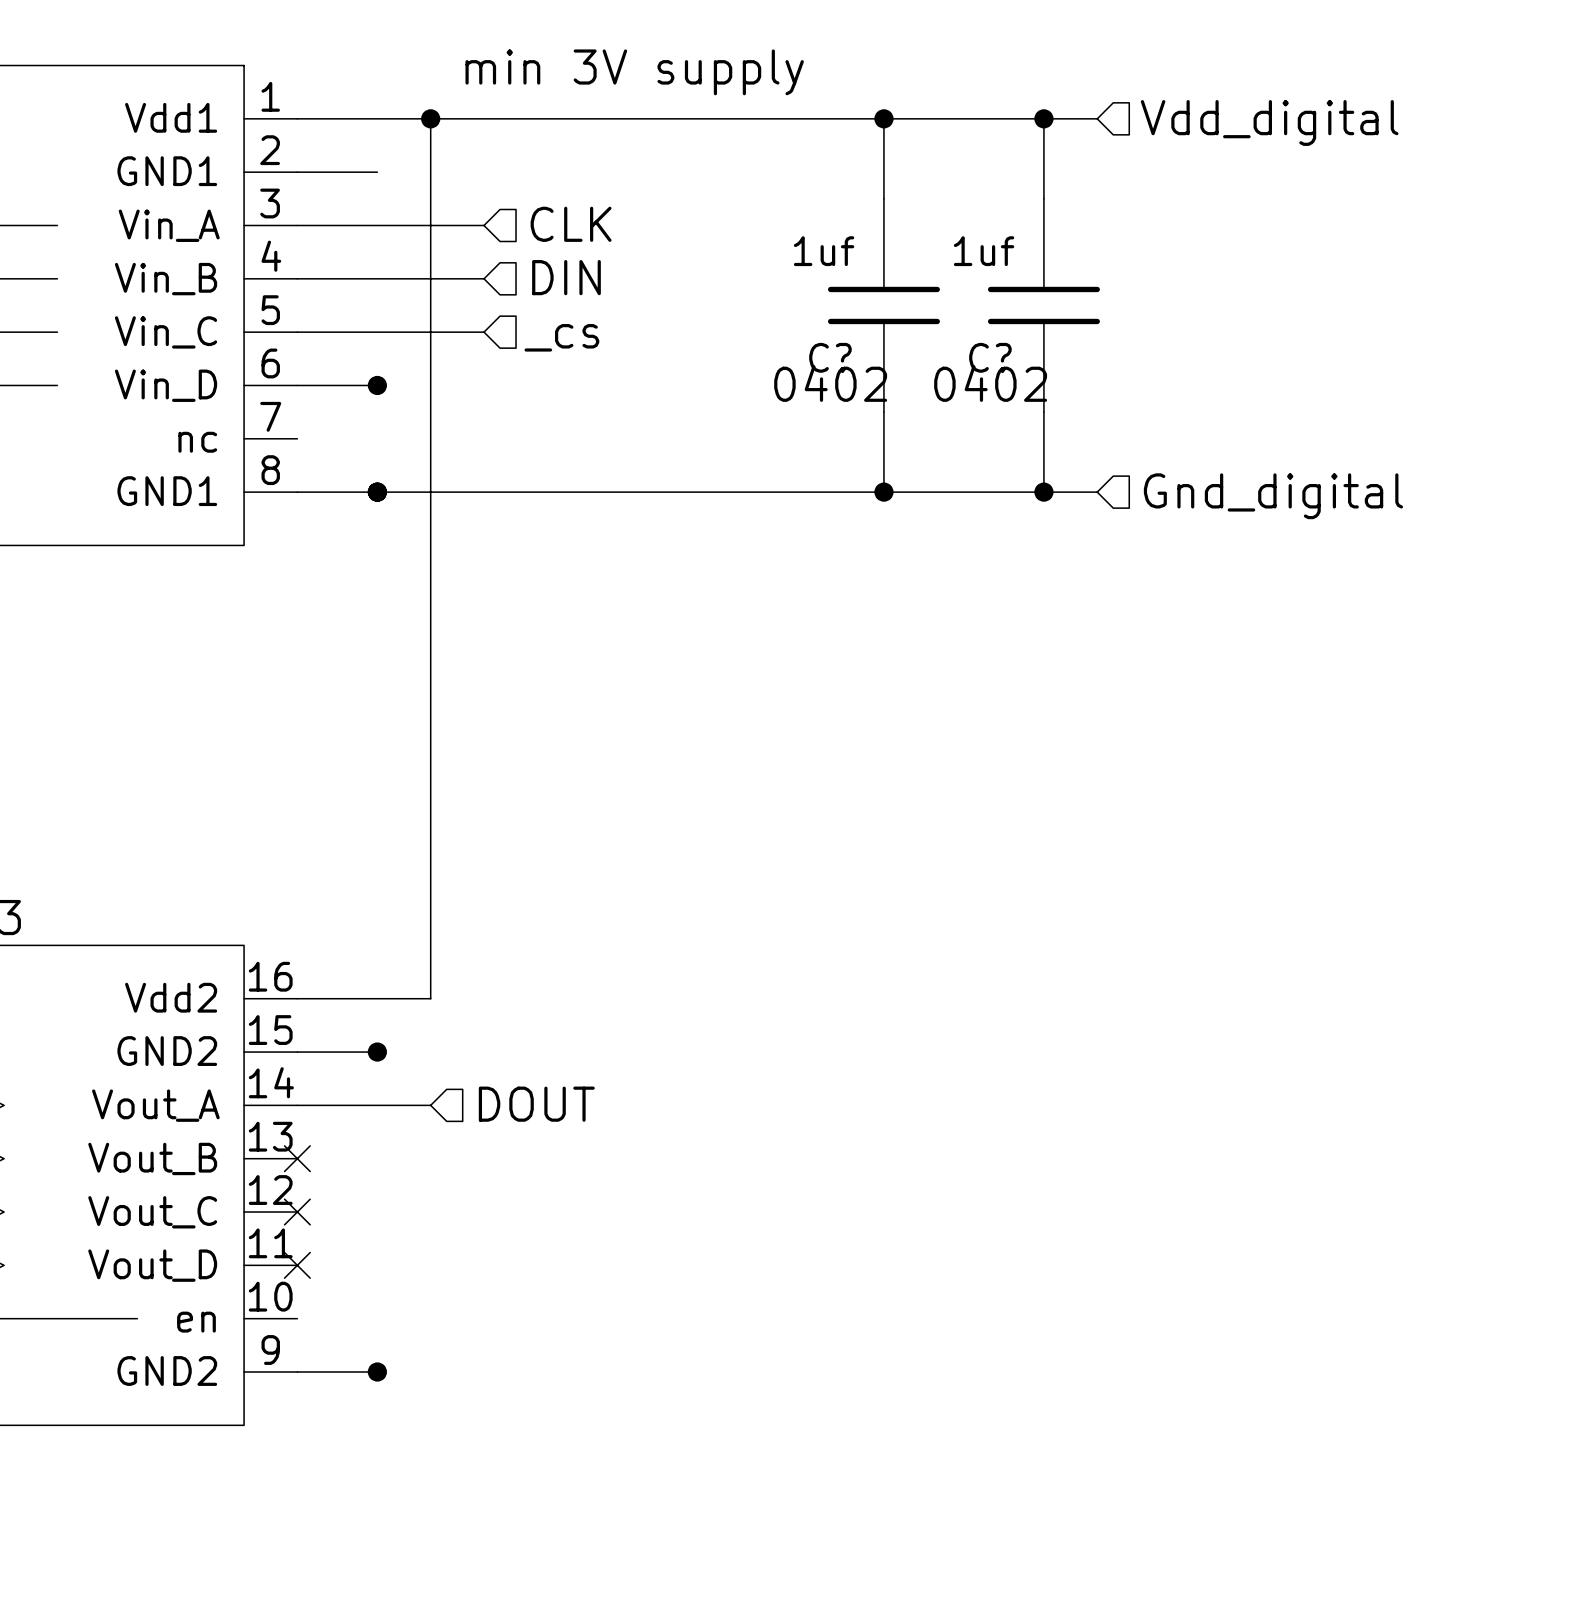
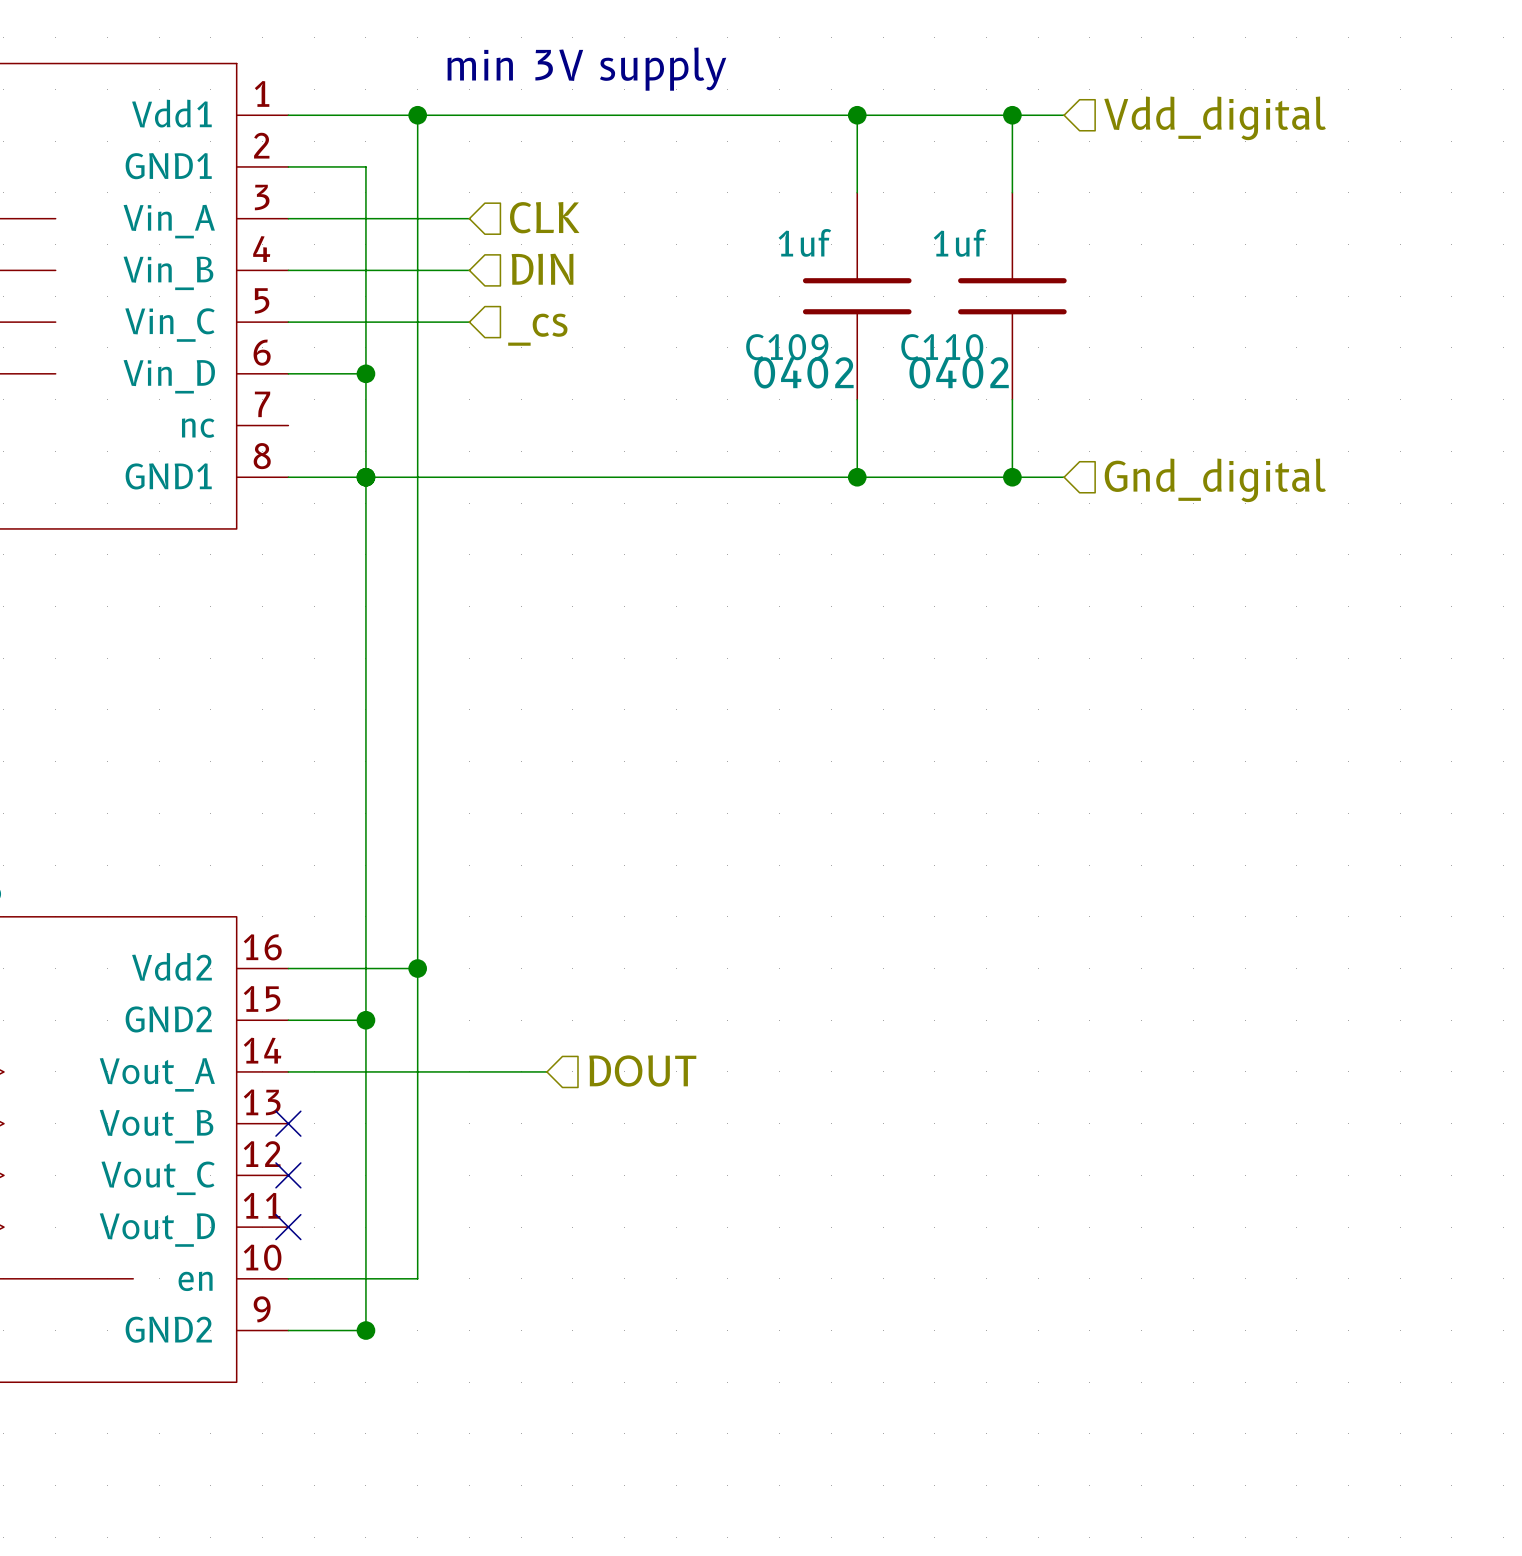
wire: none -> (365, 166) (365, 1330)
C? name: C? (830, 357) -> C109 (787, 347)
C? name: C? (990, 357) -> C110 (942, 347)
wire: none -> (417, 968) (417, 1278) (288, 1278)
junction: none -> (417, 968)
hierarchical label position: DOUT (536, 1104) -> DOUT (642, 1070)
wire: none -> (417, 1071) (546, 1071)

